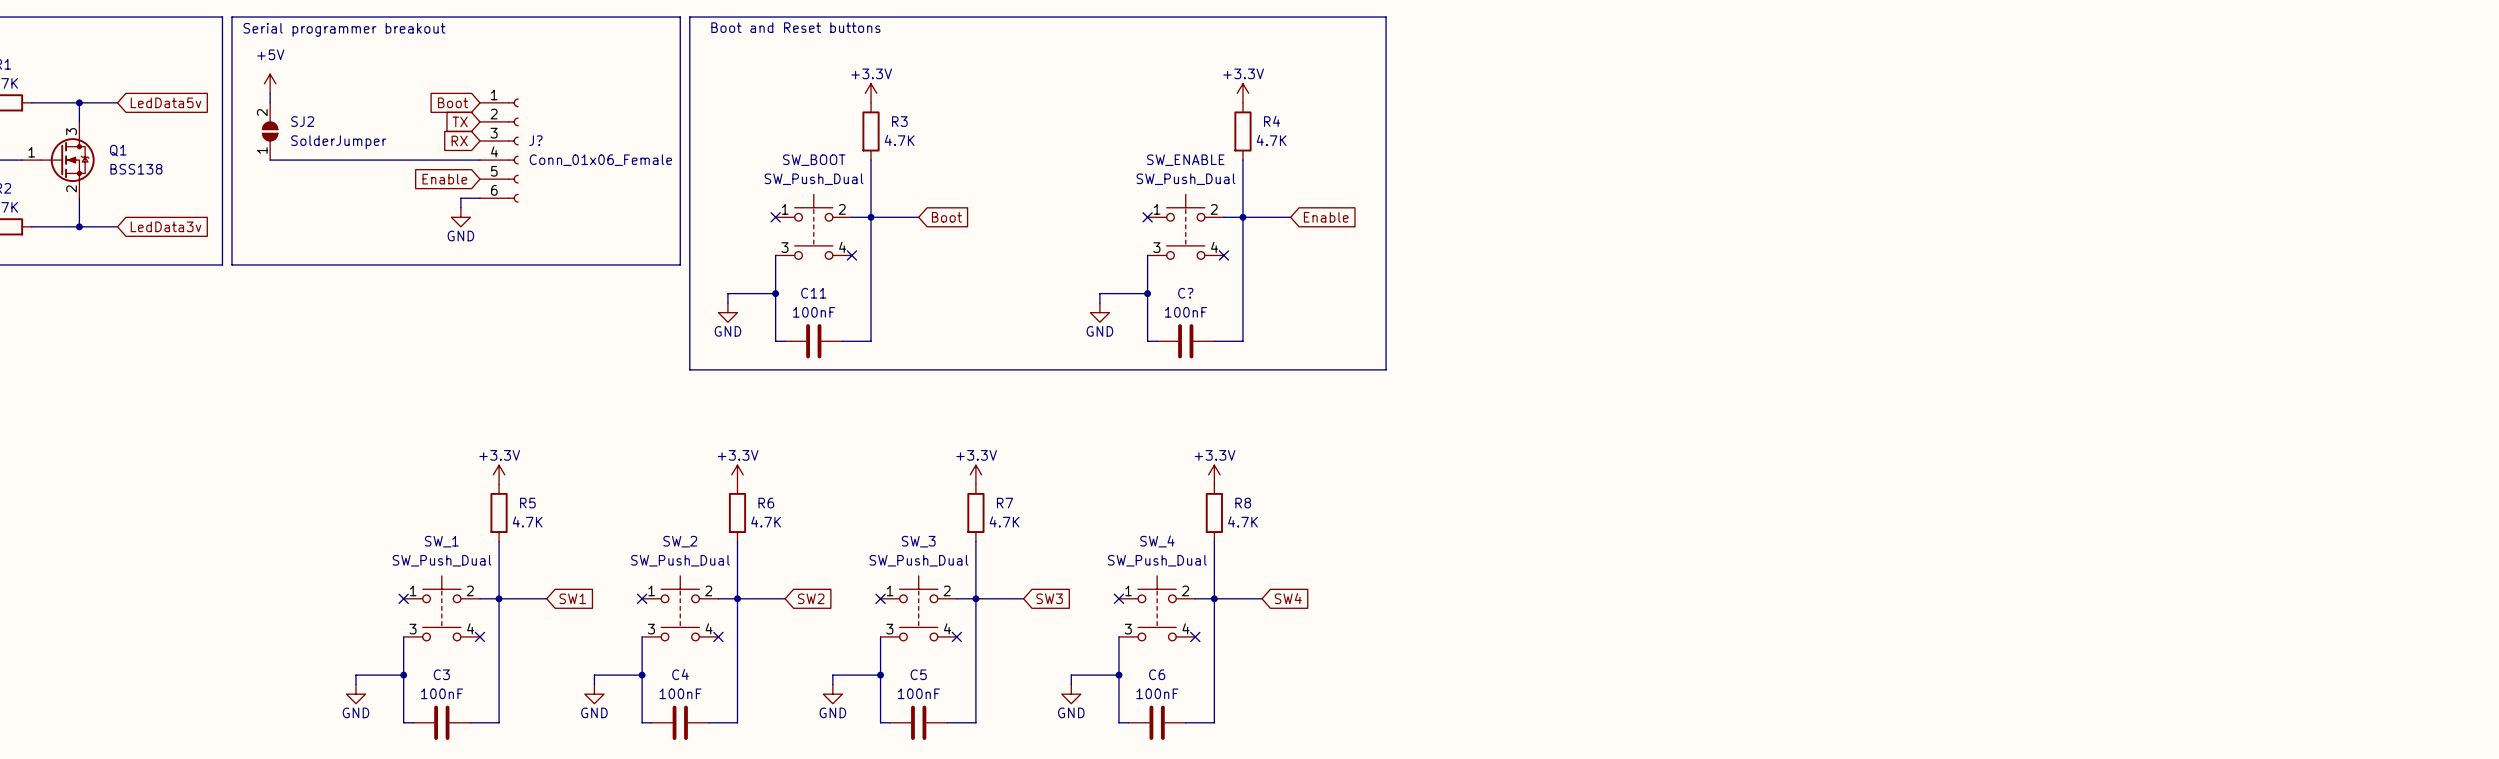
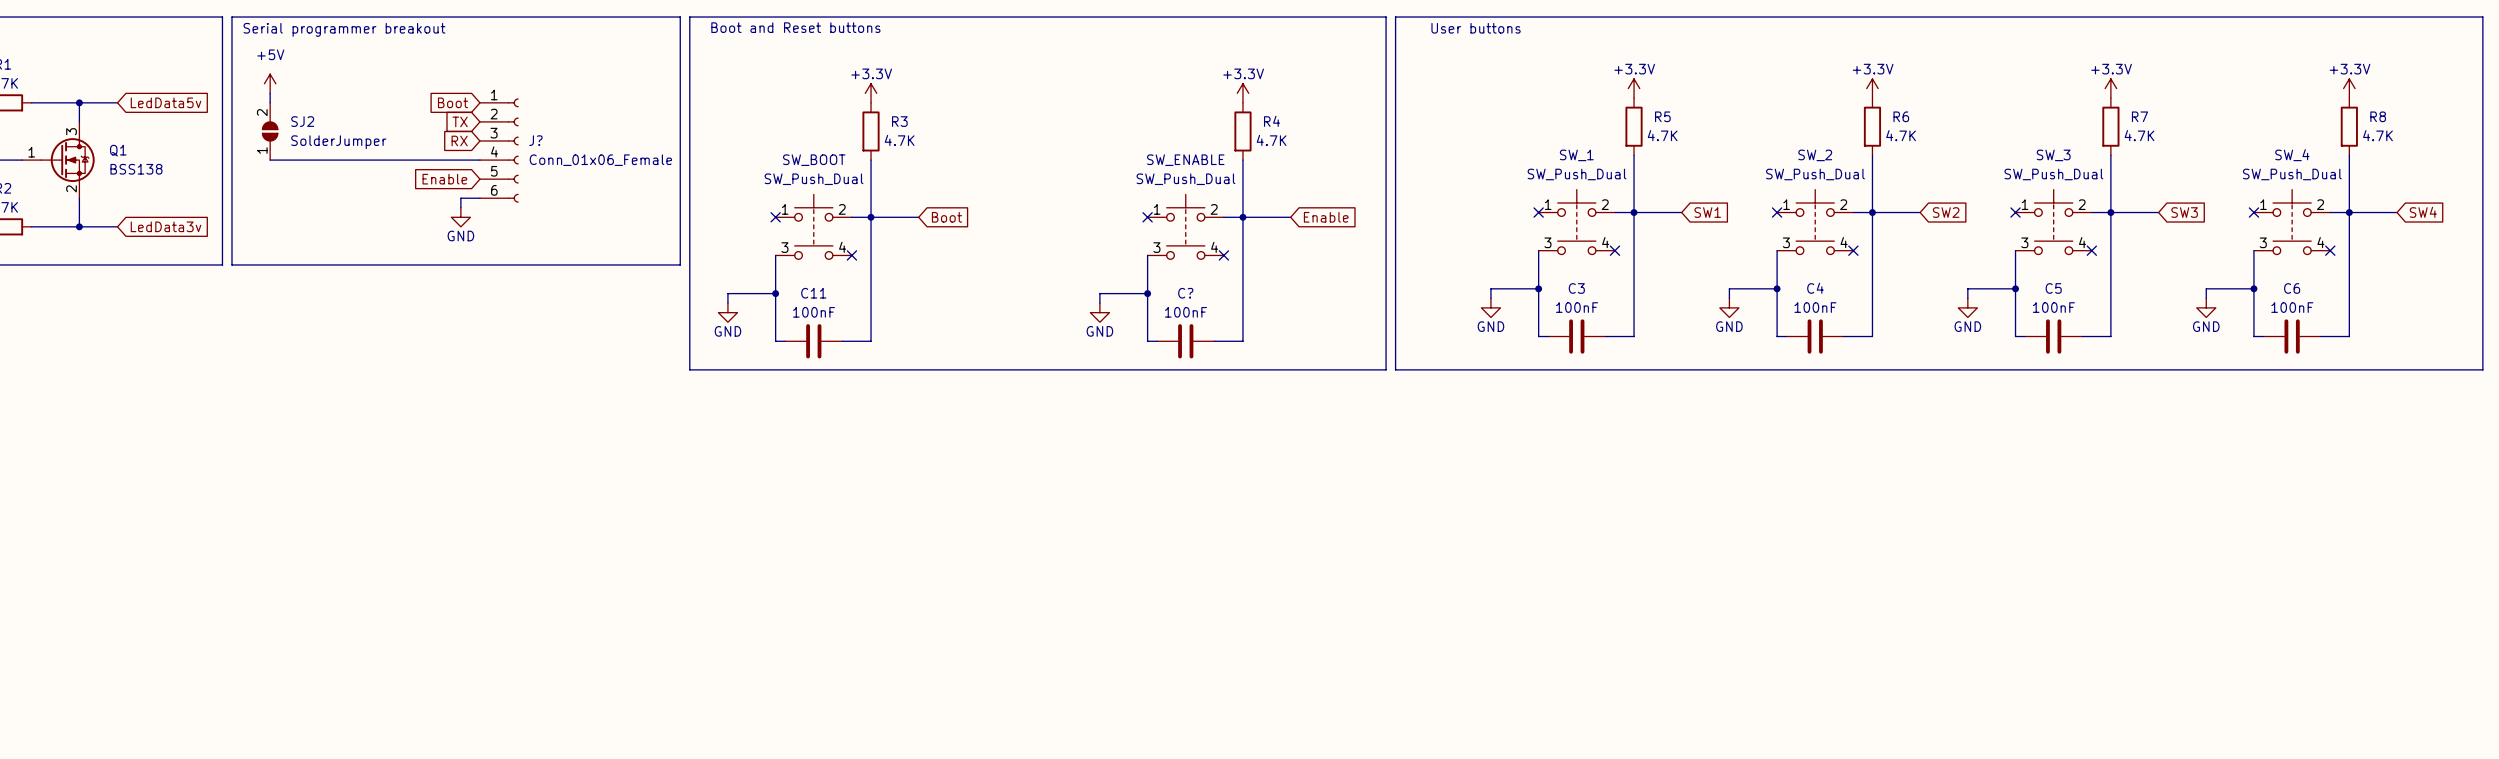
line: none -> (1395, 17) (2482, 17) (2482, 369) (1395, 369) (1395, 17)
text: none -> User buttons (1476, 28)
power symbol: none -> +3.3V (1634, 88)
power symbol: none -> +3.3V (1872, 88)
power symbol: none -> +3.3V (2110, 88)
power symbol: none -> +3.3V (2349, 88)
wire: none -> (1634, 155) (1634, 336) (1605, 336)
wire: none -> (1872, 155) (1872, 336) (1843, 336)
wire: none -> (2110, 155) (2110, 336) (2082, 336)
wire: none -> (2349, 155) (2349, 336) (2320, 336)
no-connect mark: none -> (1538, 212)
wire: none -> (1614, 212) (1681, 212)
junction: none -> (1634, 212)
global label: none -> SW1 (1707, 212)
no-connect mark: none -> (1777, 212)
wire: none -> (1853, 212) (1920, 212)
junction: none -> (1872, 212)
global label: none -> SW2 (1946, 212)
no-connect mark: none -> (2015, 212)
wire: none -> (2091, 212) (2158, 212)
junction: none -> (2110, 212)
global label: none -> SW3 (2184, 212)
no-connect mark: none -> (2253, 212)
wire: none -> (2330, 212) (2397, 212)
junction: none -> (2349, 212)
global label: none -> SW4 (2423, 212)
wire: none -> (1538, 250) (1538, 336) (1548, 336)
no-connect mark: none -> (1614, 250)
wire: none -> (1777, 250) (1777, 336) (1786, 336)
no-connect mark: none -> (1853, 250)
wire: none -> (2015, 250) (2015, 336) (2025, 336)
no-connect mark: none -> (2091, 250)
wire: none -> (2253, 250) (2253, 336) (2263, 336)
no-connect mark: none -> (2330, 250)
wire: none -> (1538, 288) (1490, 288) (1490, 298)
junction: none -> (1538, 288)
wire: none -> (1777, 288) (1729, 288) (1729, 298)
junction: none -> (1777, 288)
wire: none -> (2015, 288) (1967, 288) (1967, 298)
junction: none -> (2015, 288)
wire: none -> (2253, 288) (2206, 288) (2206, 298)
junction: none -> (2253, 288)
power symbol: none -> GND (1490, 307)
power symbol: none -> GND (1729, 307)
power symbol: none -> GND (1967, 307)
power symbol: none -> GND (2206, 307)
power symbol: +3.3V (499, 474) -> none
power symbol: +3.3V (737, 474) -> none
power symbol: +3.3V (975, 474) -> none
power symbol: +3.3V (1214, 474) -> none
R5 position: (499, 512) -> (1634, 126)
R6 position: (737, 512) -> (1872, 126)
R7 position: (975, 512) -> (2110, 126)
R8 position: (1214, 512) -> (2349, 126)
wire: (499, 541) (499, 722) (470, 722) -> none
wire: (737, 541) (737, 722) (708, 722) -> none
wire: (975, 541) (975, 722) (947, 722) -> none
wire: (1214, 541) (1214, 722) (1185, 722) -> none
no-connect mark: (403, 598) -> none
wire: (479, 598) (546, 598) -> none
junction: (499, 598) -> none
global label: SW1 (572, 598) -> none
no-connect mark: (642, 598) -> none
wire: (718, 598) (785, 598) -> none
junction: (737, 598) -> none
global label: SW2 (811, 598) -> none
no-connect mark: (880, 598) -> none
wire: (956, 598) (1023, 598) -> none
junction: (975, 598) -> none
global label: SW3 (1049, 598) -> none
no-connect mark: (1118, 598) -> none
wire: (1195, 598) (1262, 598) -> none
junction: (1214, 598) -> none
global label: SW4 (1288, 598) -> none
SW_1 position: (441, 608) -> (1576, 222)
SW_2 position: (680, 608) -> (1815, 222)
SW_3 position: (918, 608) -> (2053, 222)
SW_4 position: (1157, 608) -> (2292, 222)
wire: (403, 636) (403, 722) (413, 722) -> none
no-connect mark: (479, 636) -> none
wire: (642, 636) (642, 722) (651, 722) -> none
no-connect mark: (718, 636) -> none
wire: (880, 636) (880, 722) (890, 722) -> none
no-connect mark: (956, 636) -> none
wire: (1118, 636) (1118, 722) (1128, 722) -> none
no-connect mark: (1195, 636) -> none
wire: (403, 675) (355, 675) (355, 684) -> none
junction: (403, 675) -> none
wire: (642, 675) (594, 675) (594, 684) -> none
junction: (642, 675) -> none
wire: (880, 675) (832, 675) (832, 684) -> none
junction: (880, 675) -> none
wire: (1118, 675) (1071, 675) (1071, 684) -> none
junction: (1118, 675) -> none
power symbol: GND (355, 694) -> none
power symbol: GND (594, 694) -> none
power symbol: GND (832, 694) -> none
power symbol: GND (1071, 694) -> none
C3 position: (441, 722) -> (1576, 336)
C4 position: (680, 722) -> (1815, 336)
C5 position: (918, 722) -> (2053, 336)
C6 position: (1157, 722) -> (2292, 336)

